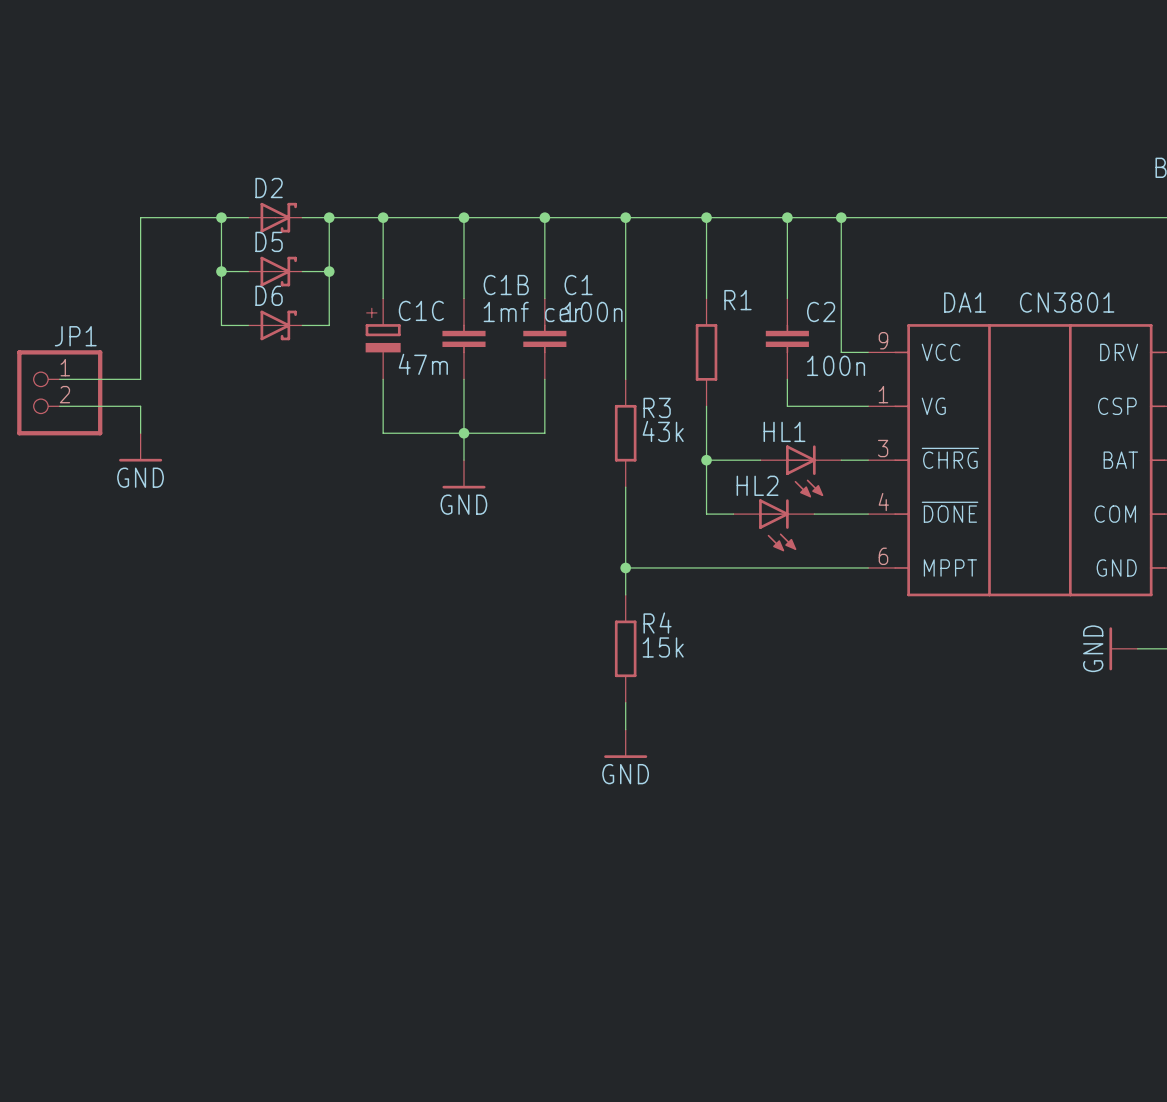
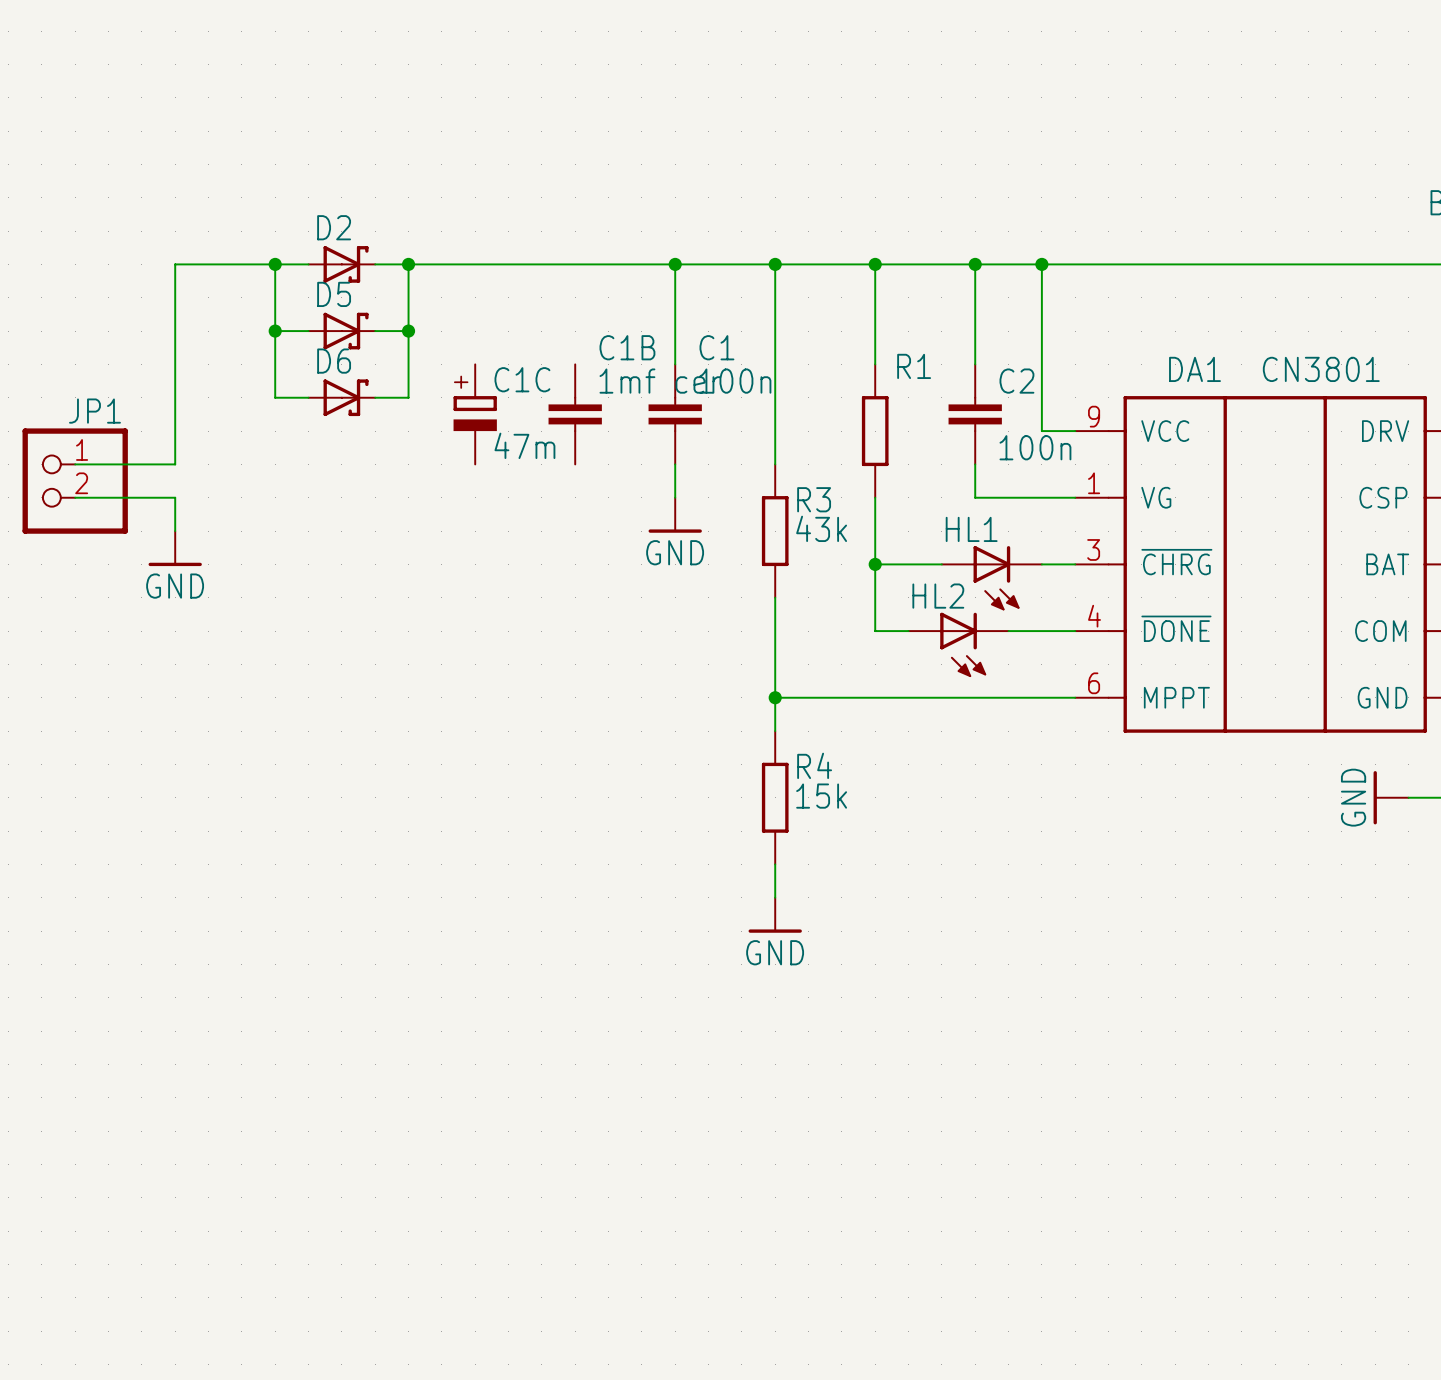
wire: (383, 217) (383, 298) -> none
junction: (383, 217) -> none
wire: (463, 217) (463, 298) -> none
junction: (463, 217) -> none
wire: (383, 379) (383, 433) (544, 433) (544, 406) -> none
wire: (463, 379) (463, 460) -> none
junction: (463, 433) -> none
power symbol position: GND (463, 474) -> GND (675, 515)

